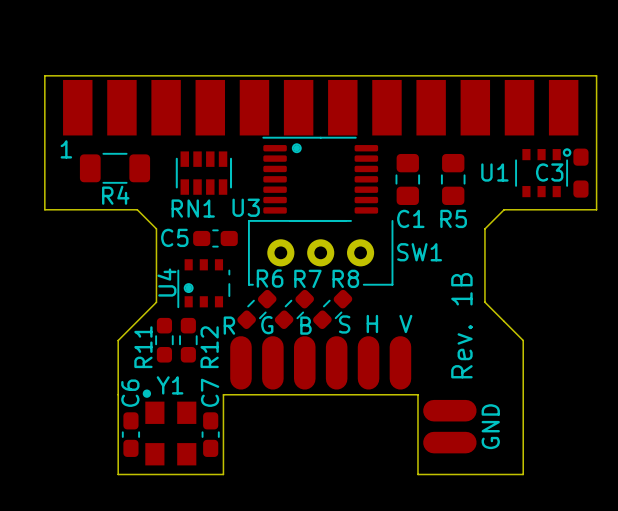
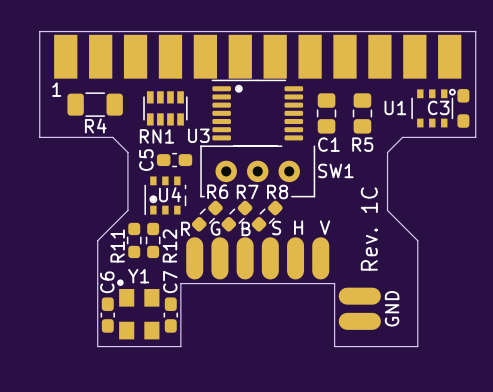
C5 name rotation: 0° (174, 237) -> 90° counterclockwise (146, 160)
U4 name rotation: 0° (166, 282) -> 90° clockwise (170, 194)
U4 name position: U4 (166, 282) -> U4 (170, 194)
text: Rev. 1B (461, 325) -> Rev. 1C (369, 229)

